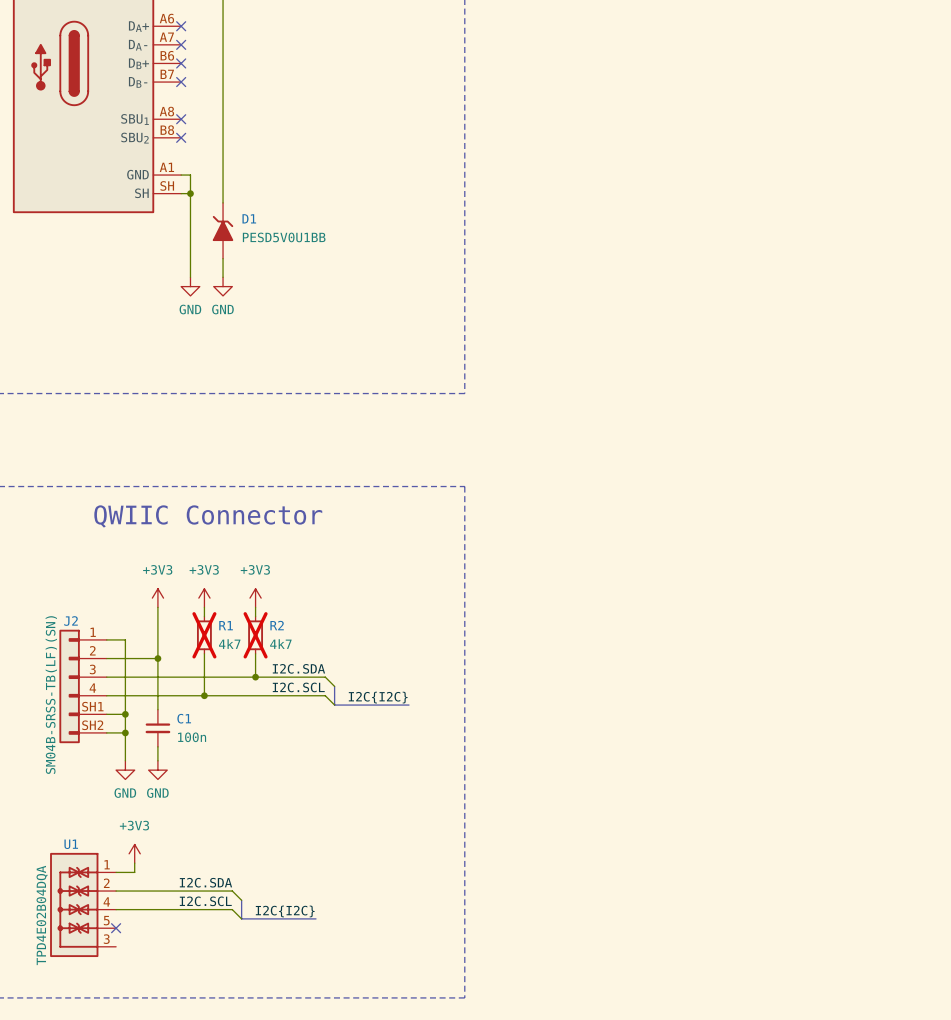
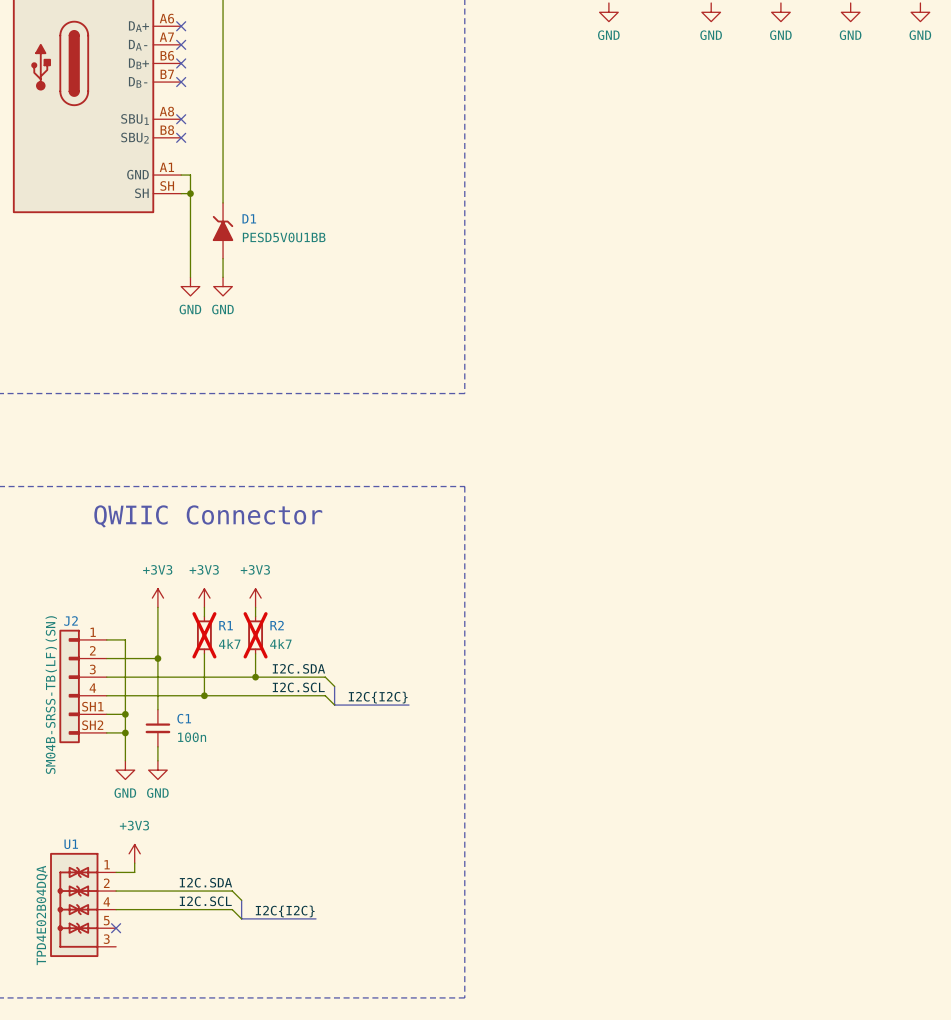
power symbol: none -> GND (608, 12)
power symbol: none -> GND (711, 12)
power symbol: none -> GND (780, 12)
power symbol: none -> GND (850, 12)
power symbol: none -> GND (920, 12)

